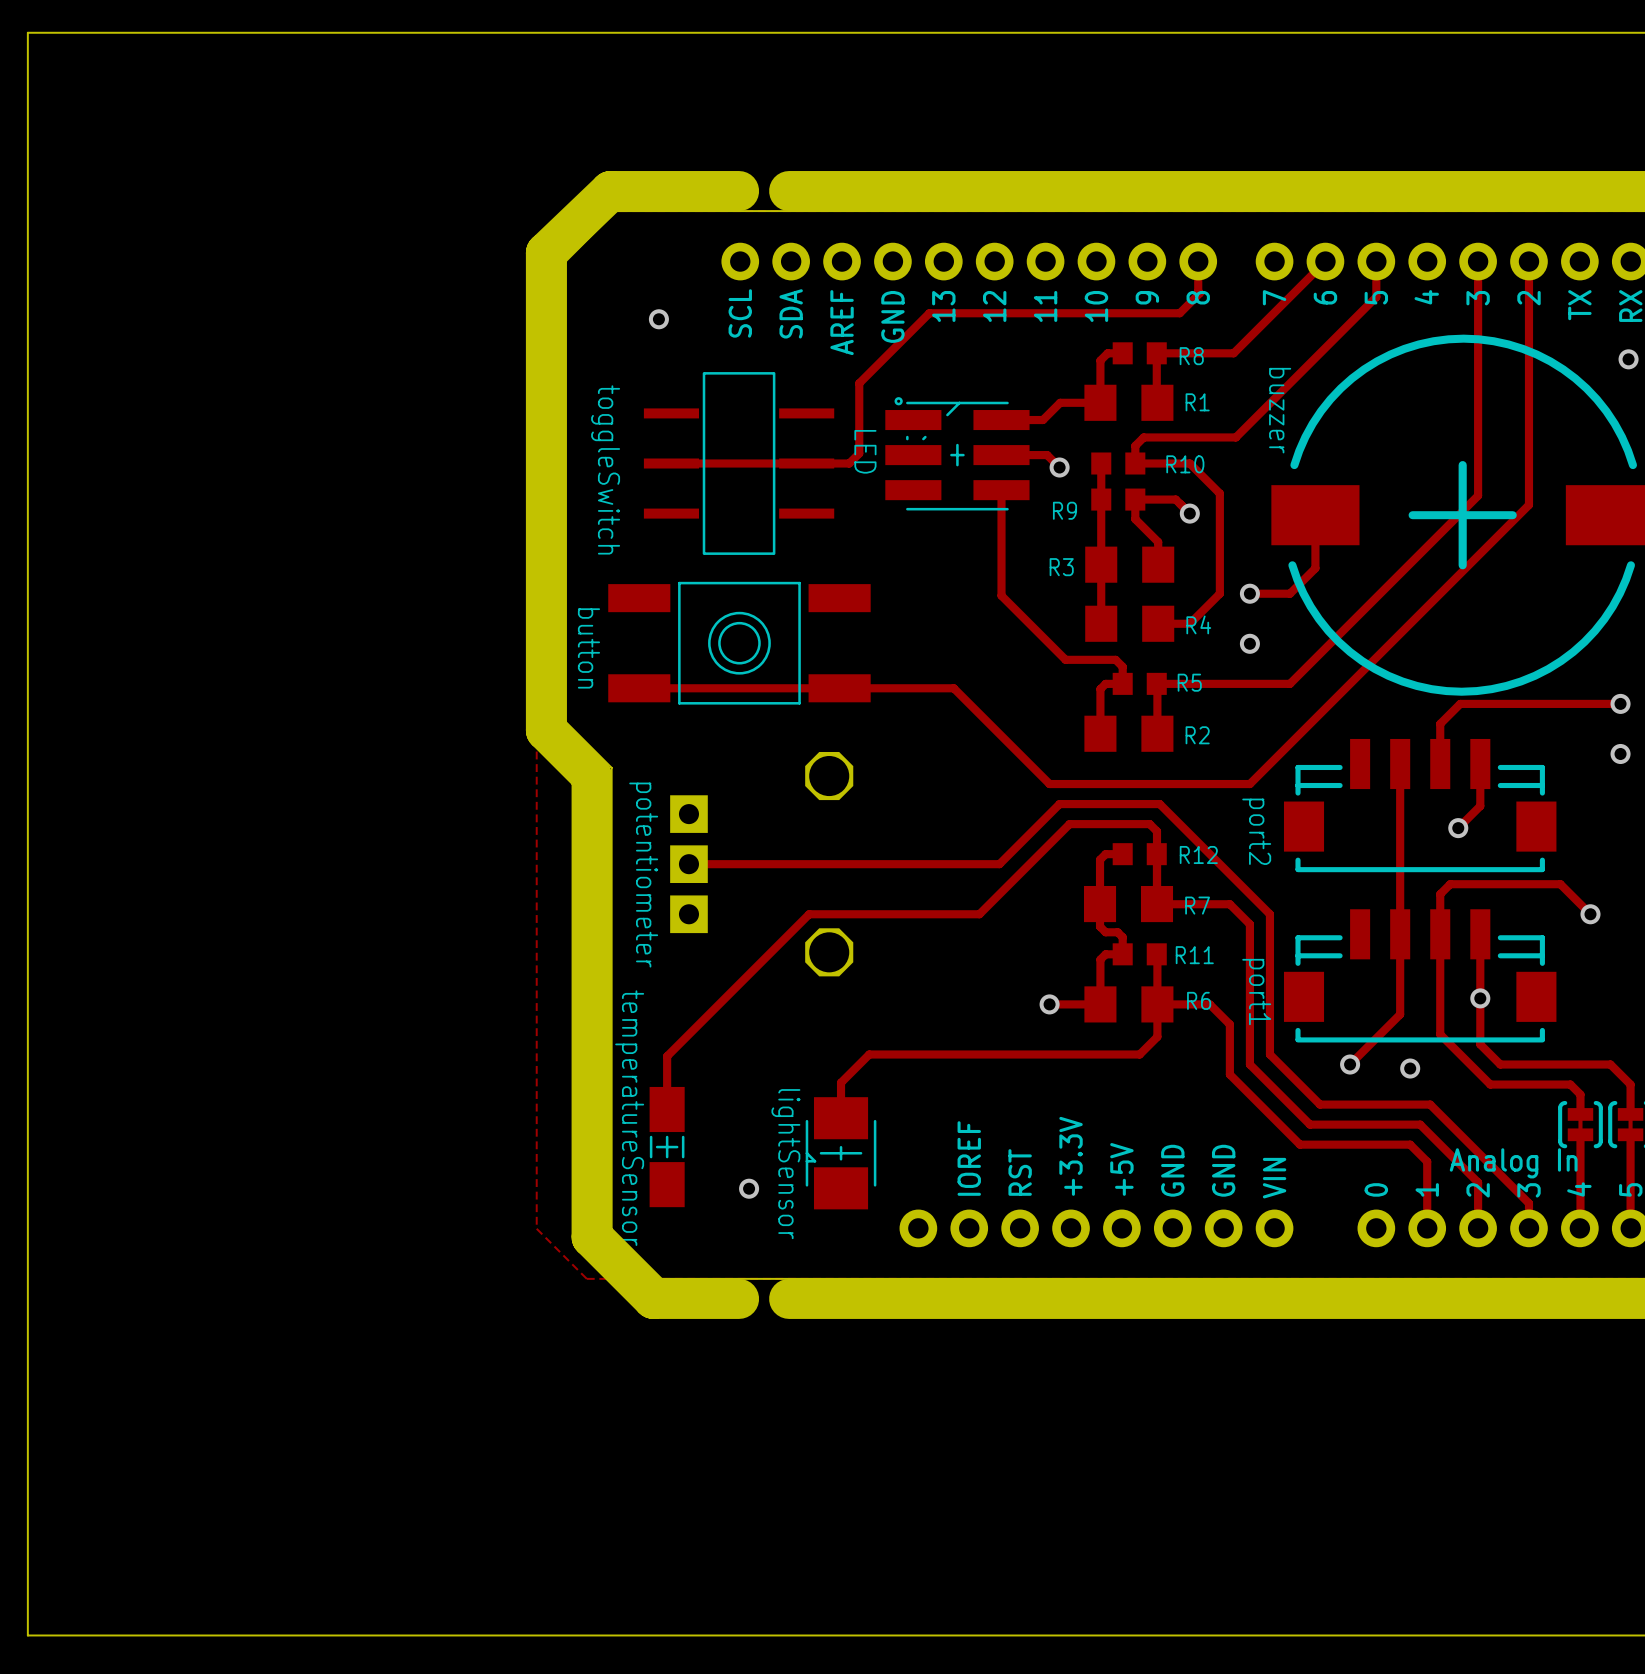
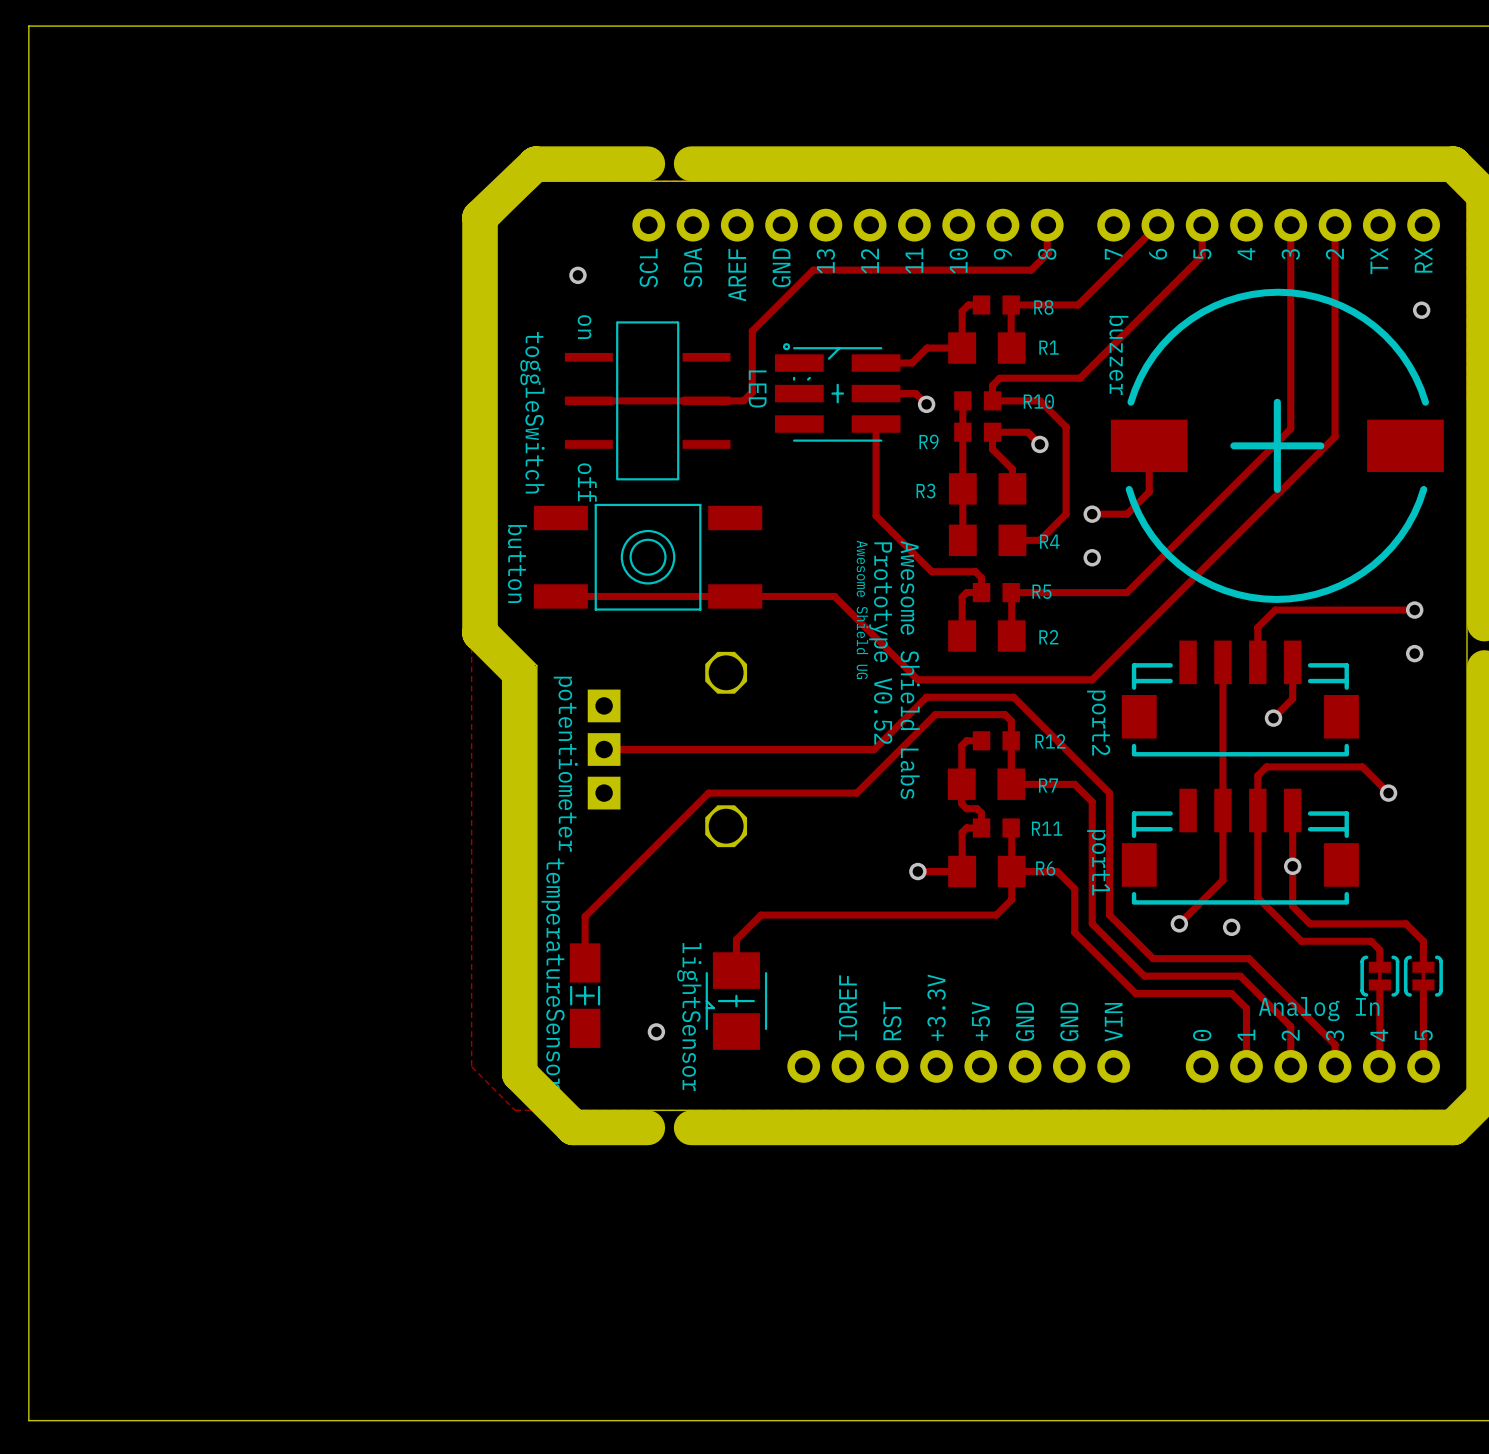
text: none -> on (584, 327)
text: none -> off (587, 482)
text: none -> Awesome Shield UG (862, 609)
text: none -> Prototype V0.52 (880, 643)
text: none -> Awesome Shield Labs (910, 669)

